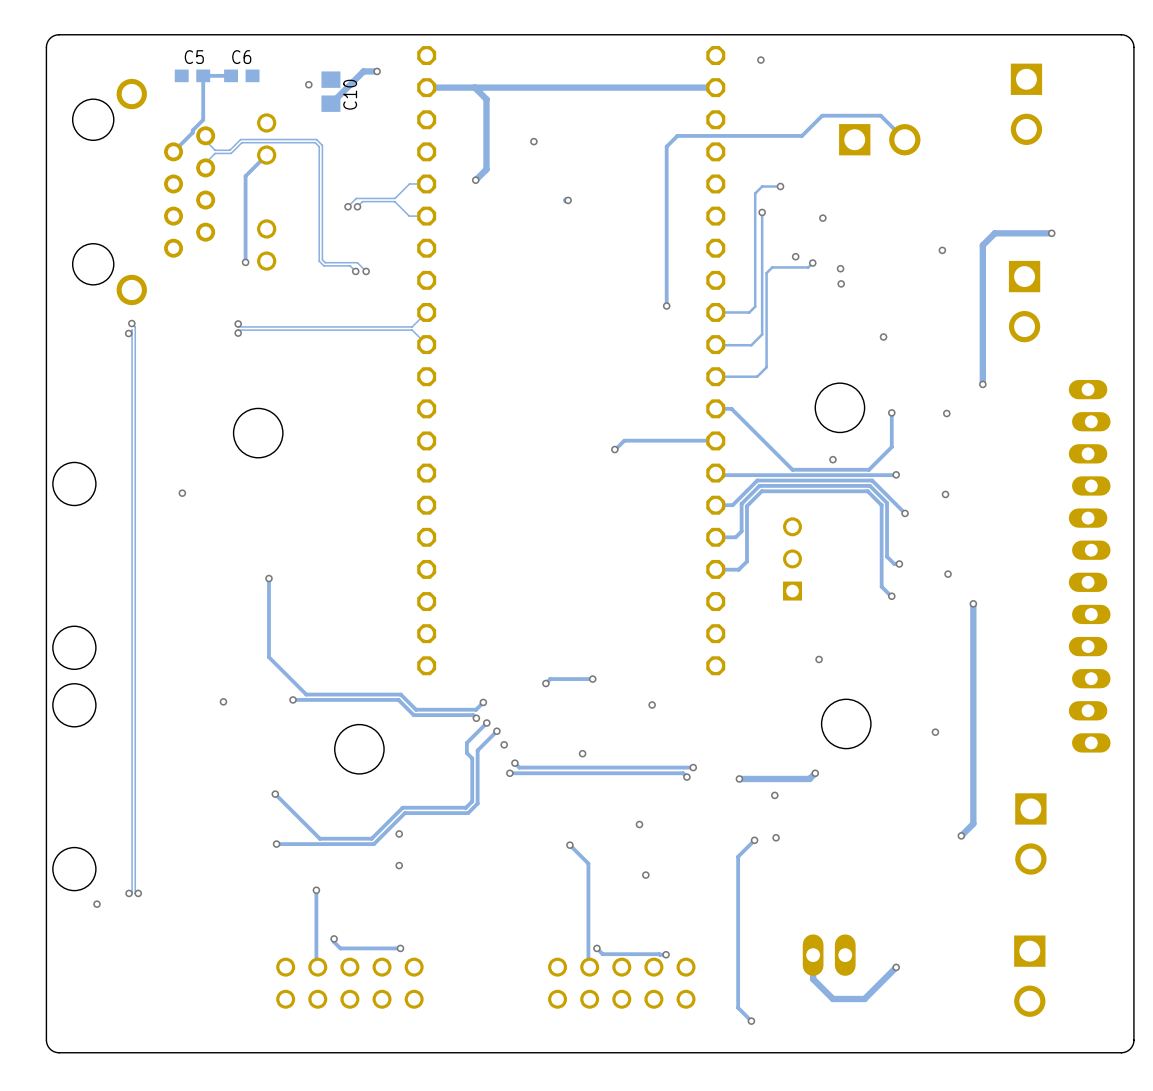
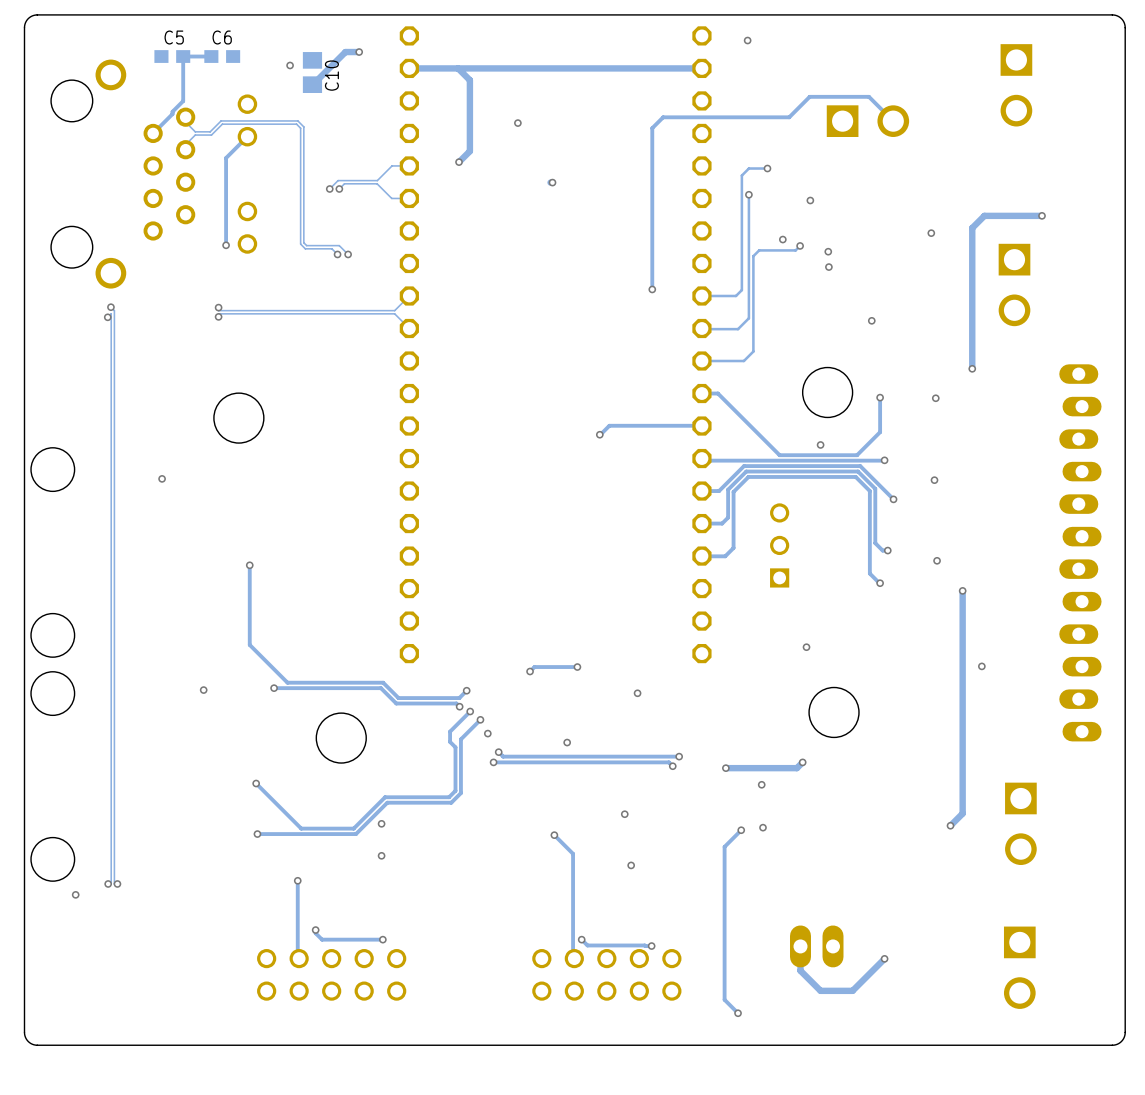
via: none -> (981, 666)
via: (935, 732) -> none

